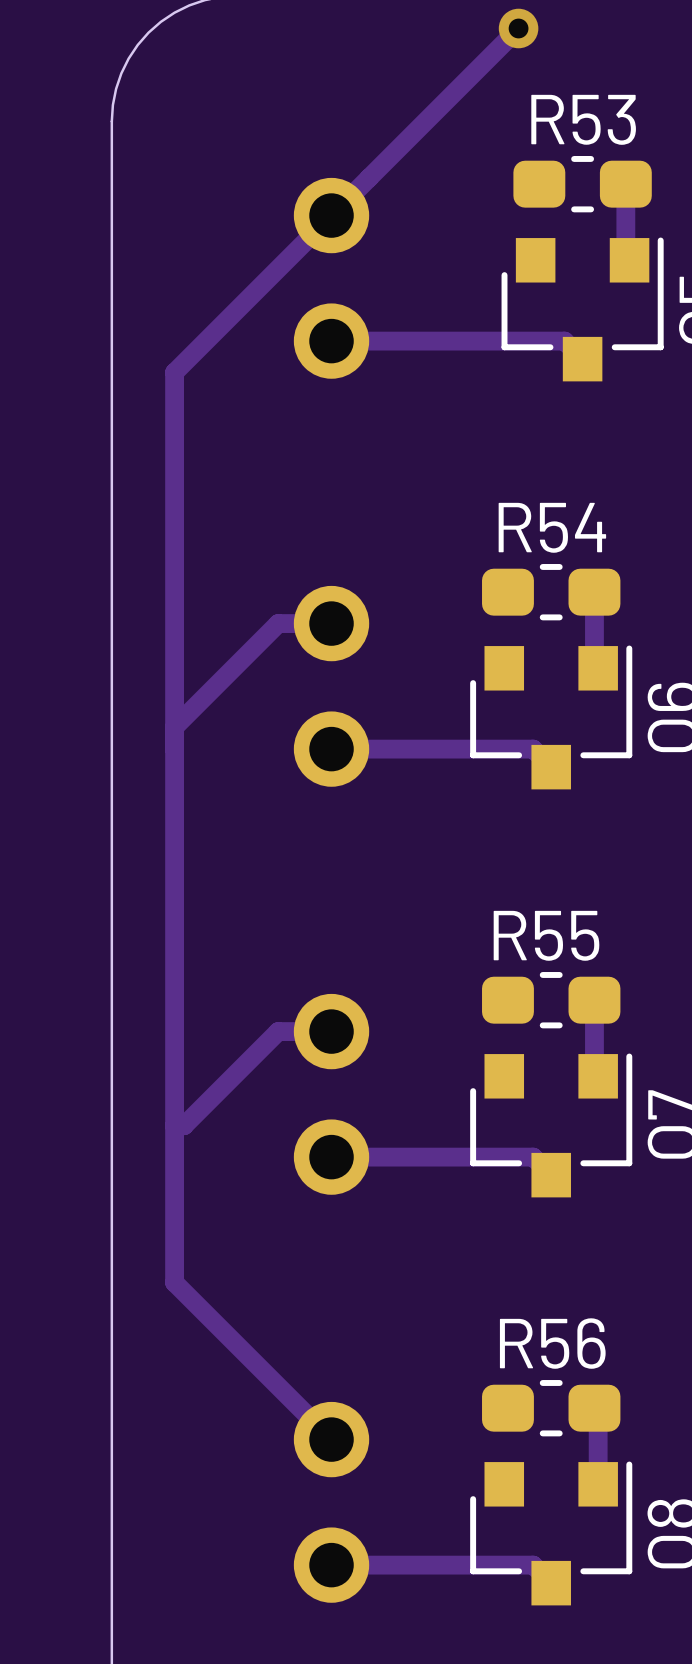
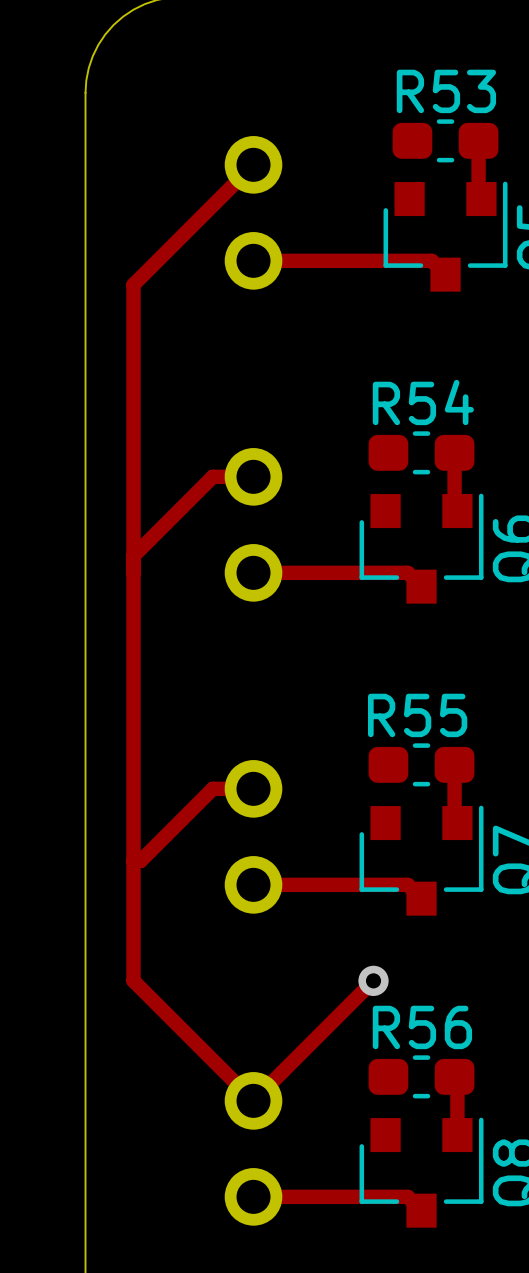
track: (518, 28) (331, 215) -> none
via: (518, 28) -> none
track: none -> (373, 980) (253, 1100)
via: none -> (373, 980)

